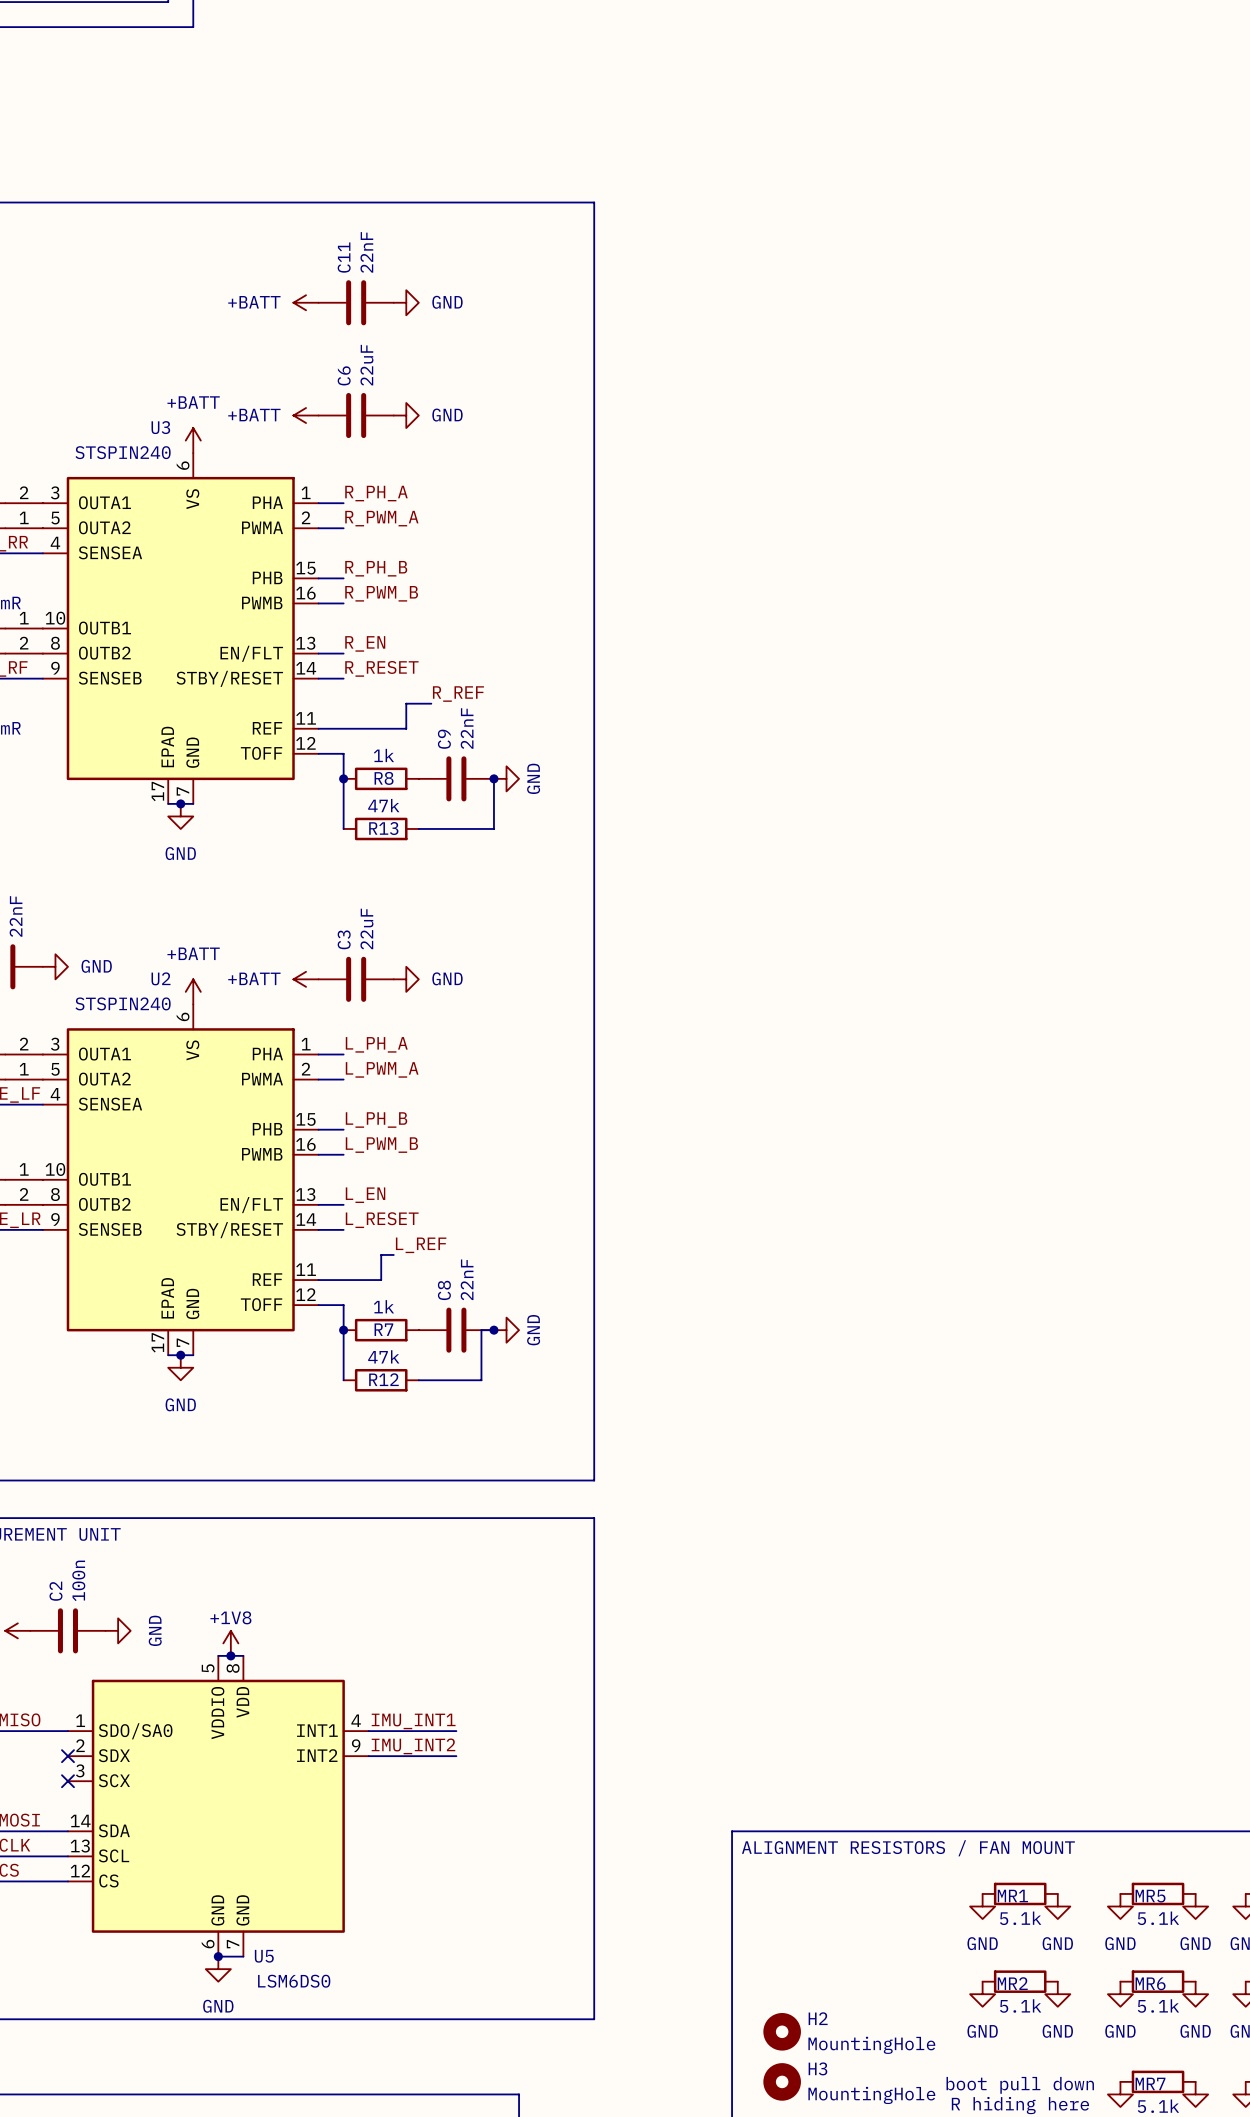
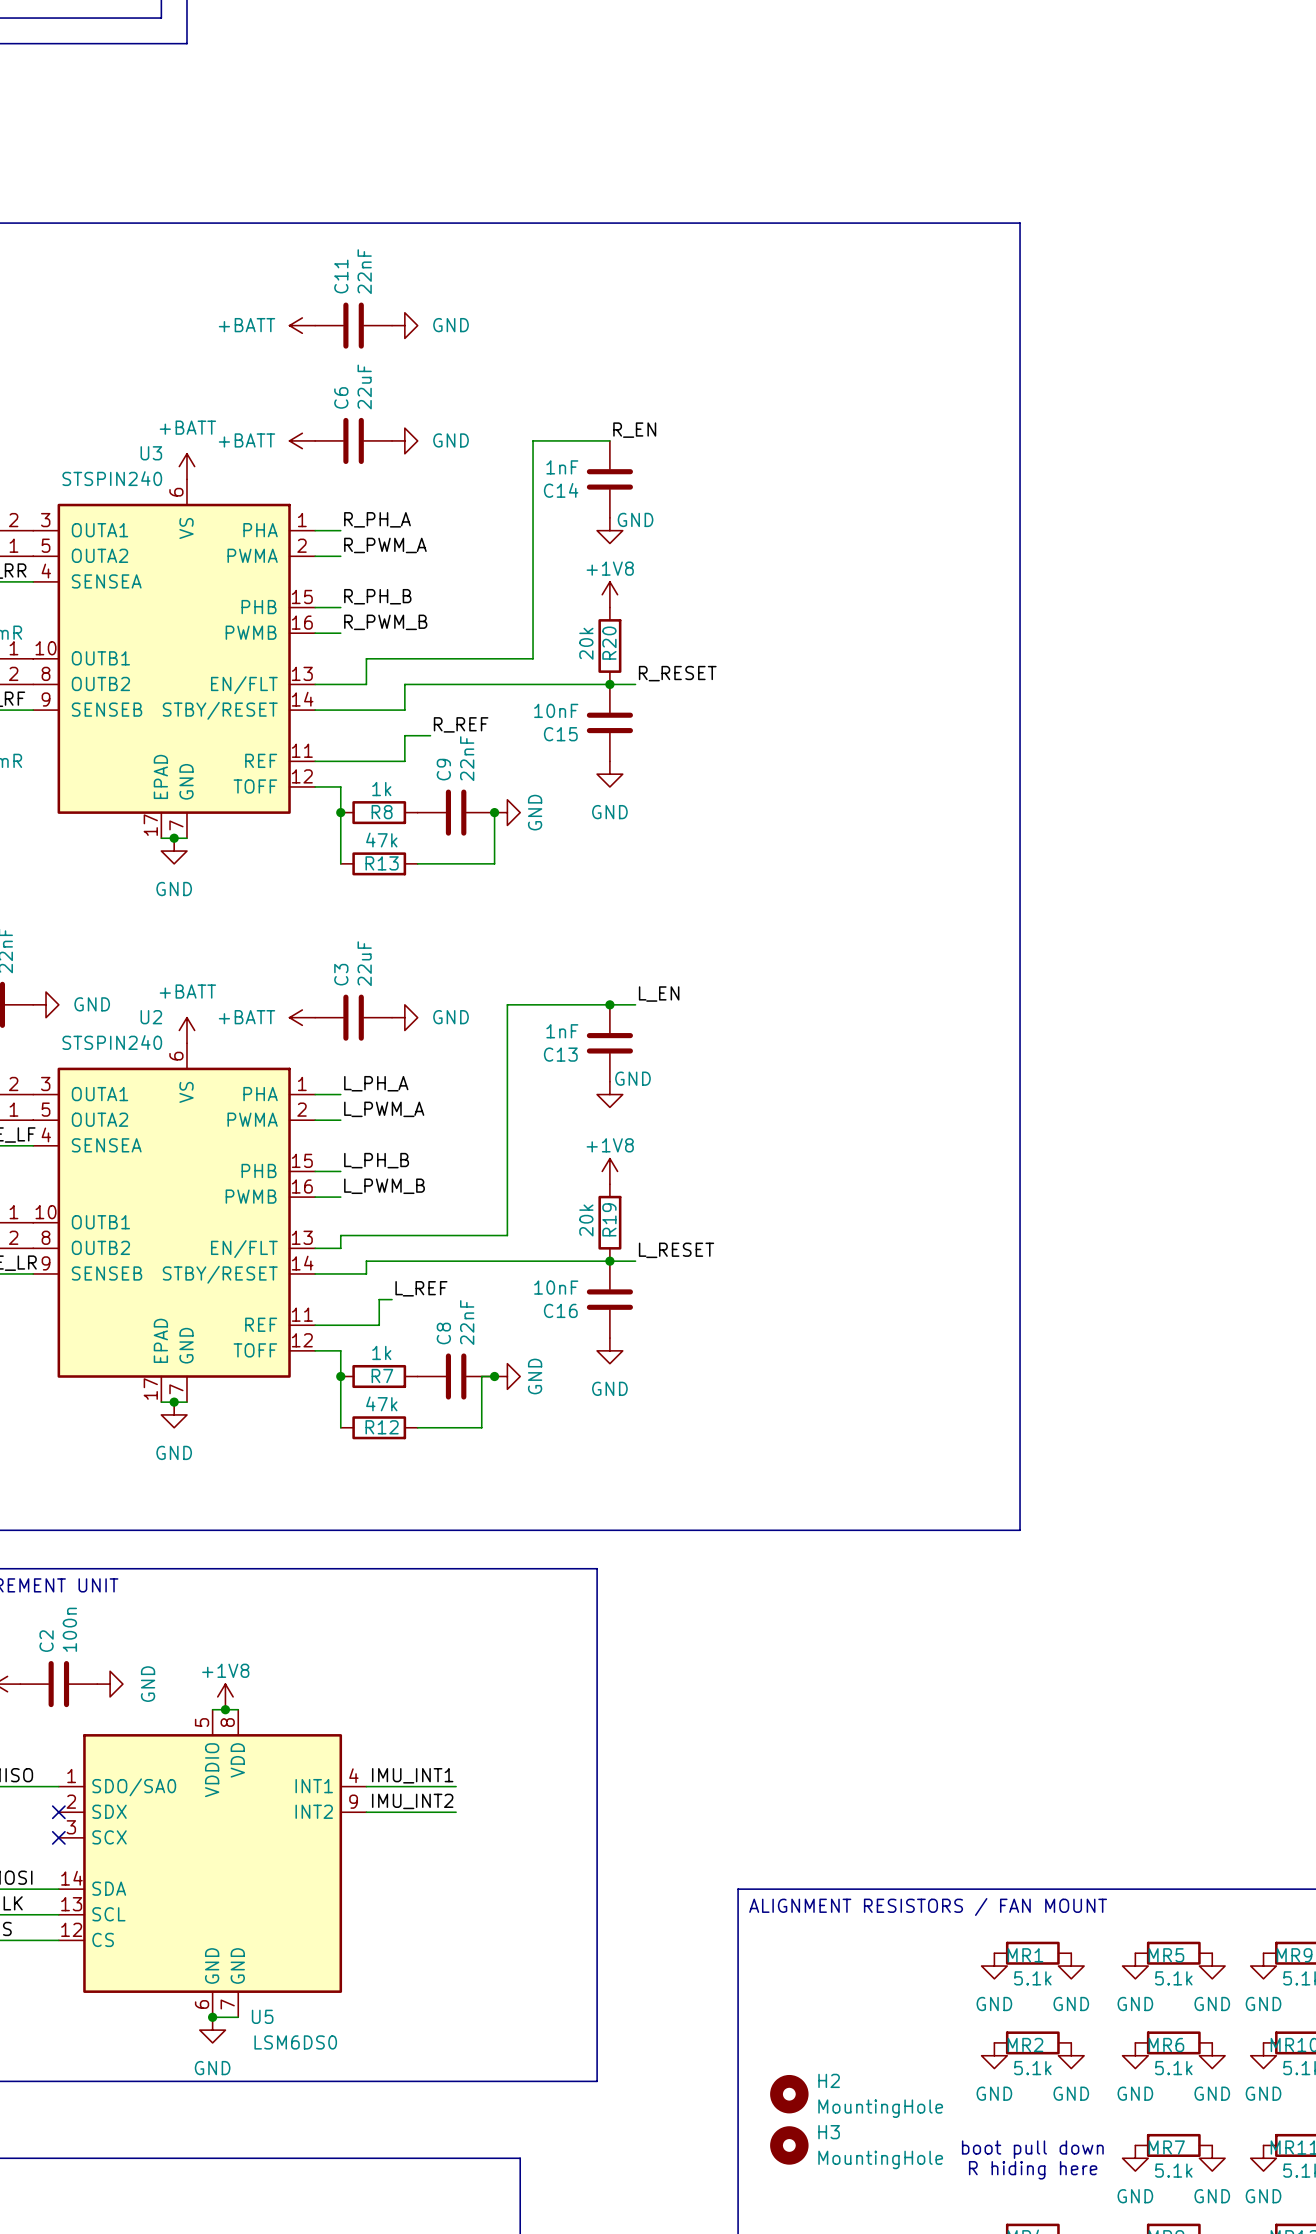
line: (594, 202) (594, 1480) -> (597, 223) (1020, 223) (1020, 1530) (597, 1530)
label: none -> R_EN (634, 430)
wire: none -> (609, 440) (533, 440) (533, 658) (366, 658) (366, 684) (340, 684)
C14: none -> 1nF (609, 479)
power symbol: none -> GND (609, 530)
power symbol: none -> +1V8 (609, 594)
R20: none -> 20k (609, 646)
label: R_EN (365, 643) -> none
label: none -> R_RESET (677, 673)
junction: none -> (609, 684)
wire: none -> (635, 684) (404, 684) (404, 710) (340, 710)
label: R_RESET (381, 668) -> none
C15: none -> 10nF (609, 722)
power symbol: none -> GND (609, 774)
label: none -> L_EN (659, 994)
junction: none -> (609, 1004)
wire: none -> (635, 1004) (507, 1004) (507, 1235) (340, 1235) (340, 1248)
C13: none -> 1nF (609, 1043)
power symbol: none -> GND (609, 1094)
power symbol: none -> +1V8 (609, 1171)
R19: none -> 20k (609, 1222)
label: L_EN (365, 1195) -> none
label: none -> L_RESET (676, 1250)
junction: none -> (609, 1261)
wire: none -> (635, 1261) (366, 1261) (366, 1273) (340, 1273)
label: L_RESET (382, 1220) -> none
C16: none -> 10nF (609, 1299)
power symbol: none -> GND (609, 1350)

